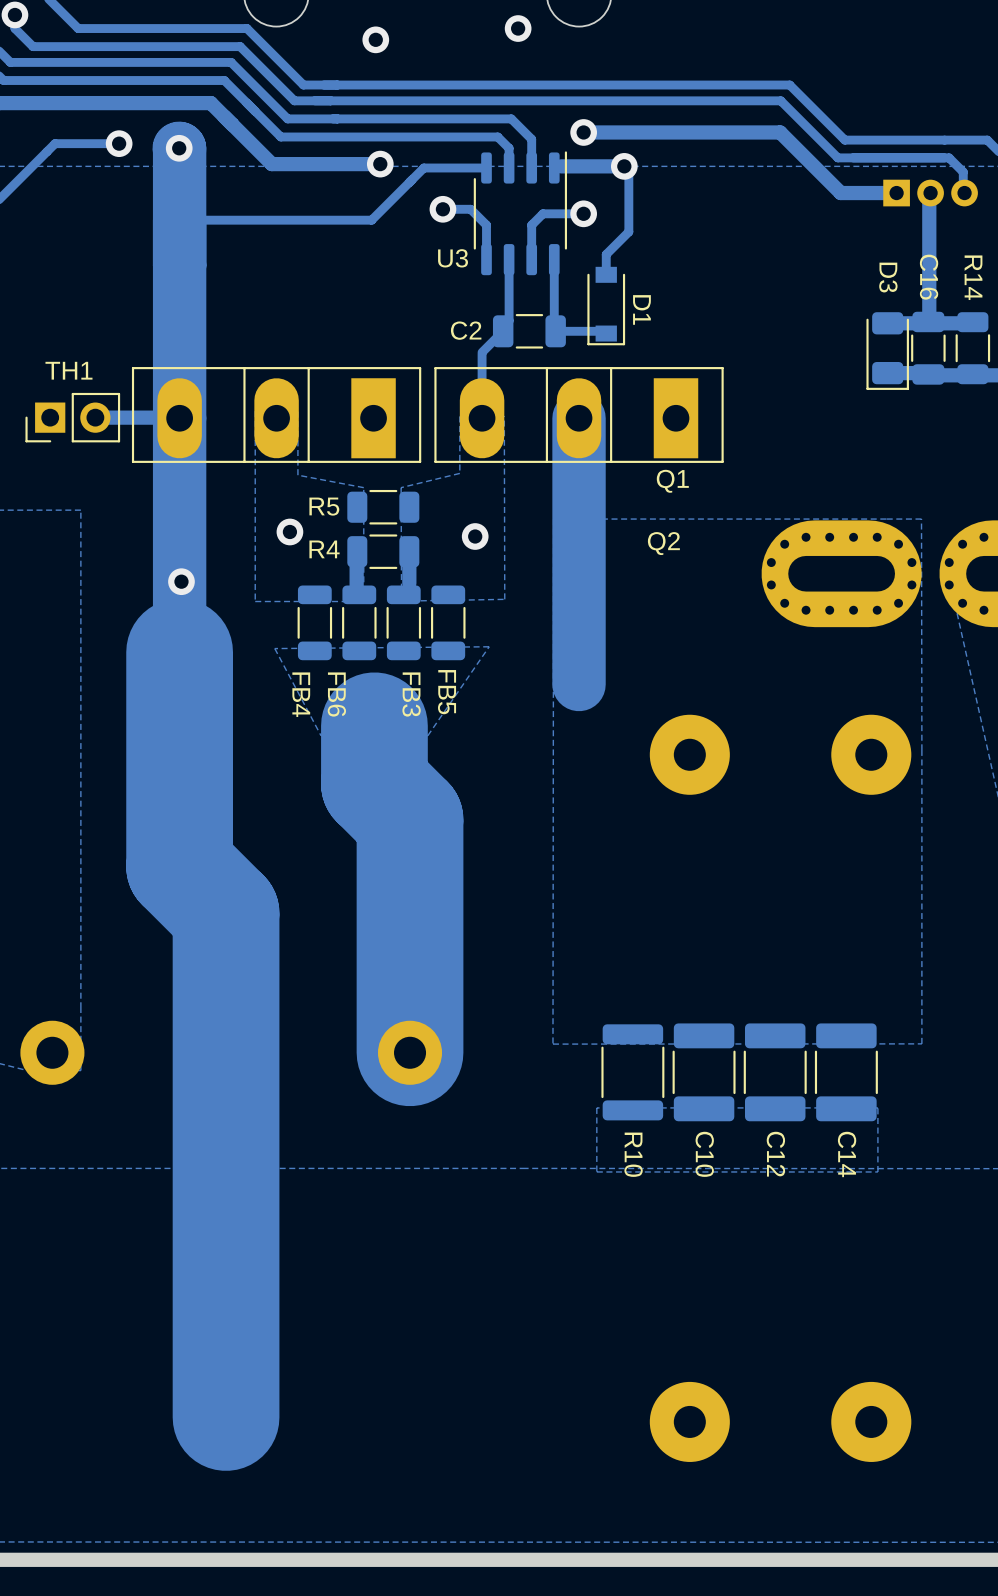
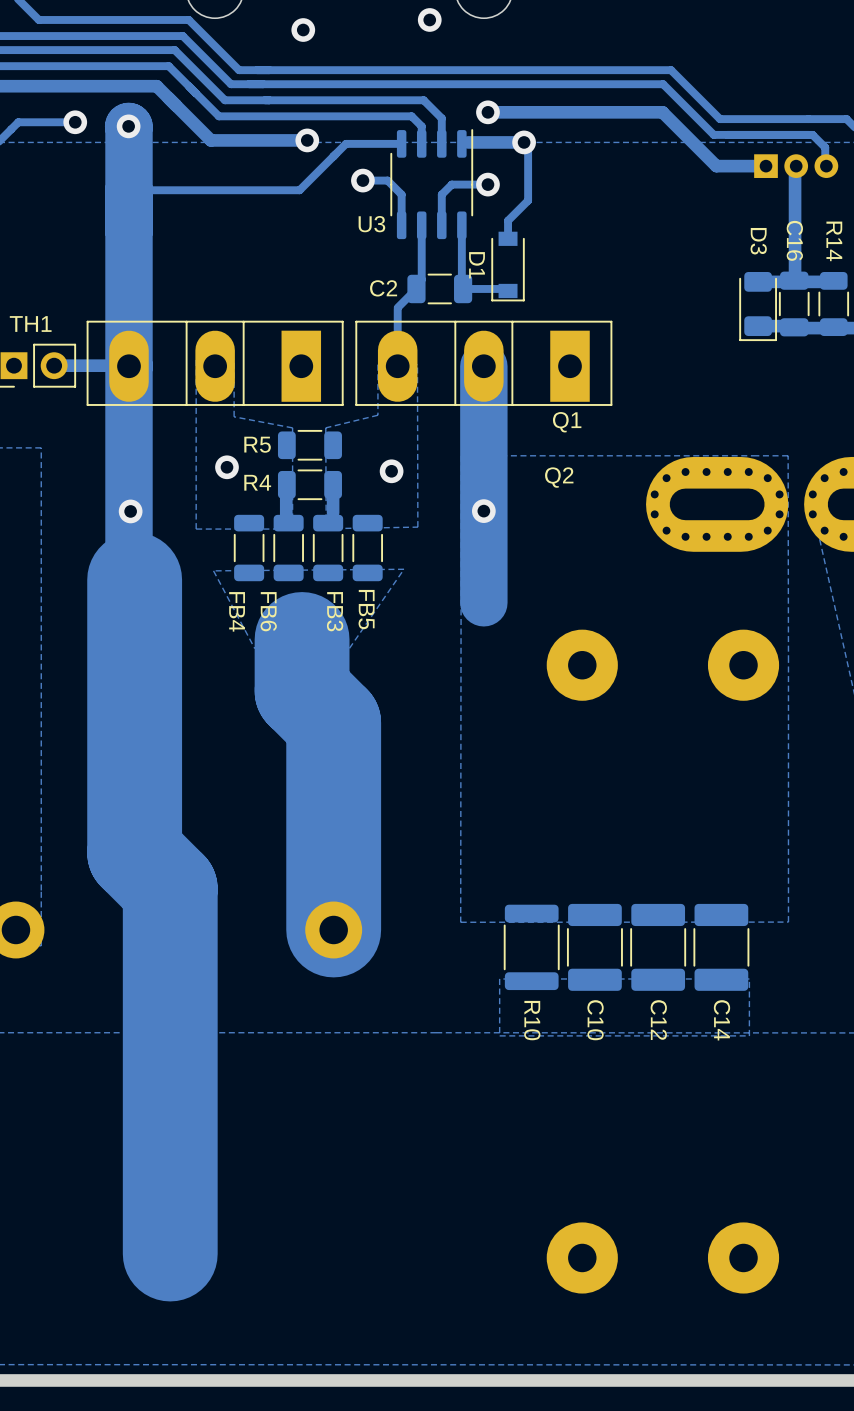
D1 name position: D1 (641, 309) -> D1 (477, 265)
via: none -> (483, 511)
track: (179, 652) (179, 866) (226, 913) (226, 1006) -> (128, 574) (134, 579) (134, 853) (170, 888)

